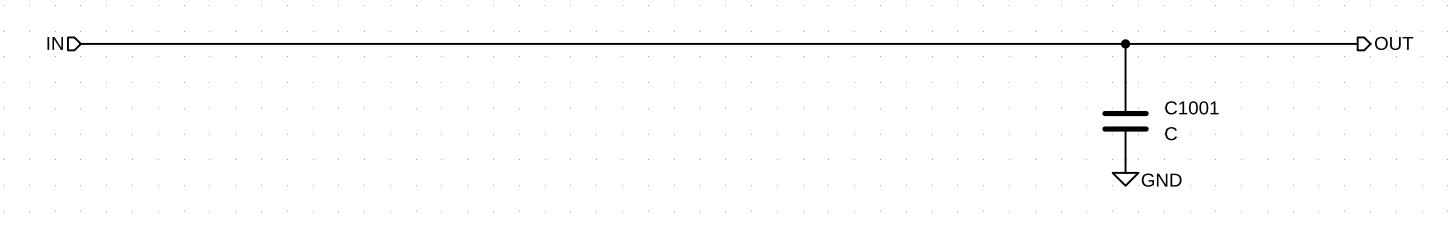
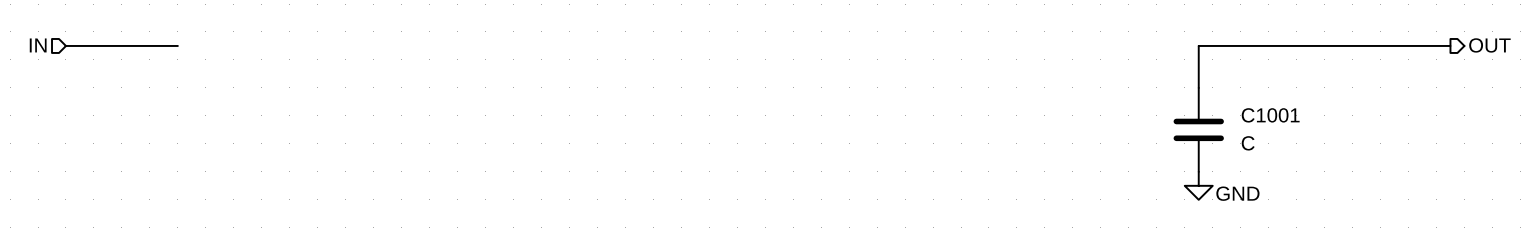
wire: (184, 43) (1125, 43) -> none
junction: (1125, 43) -> none

